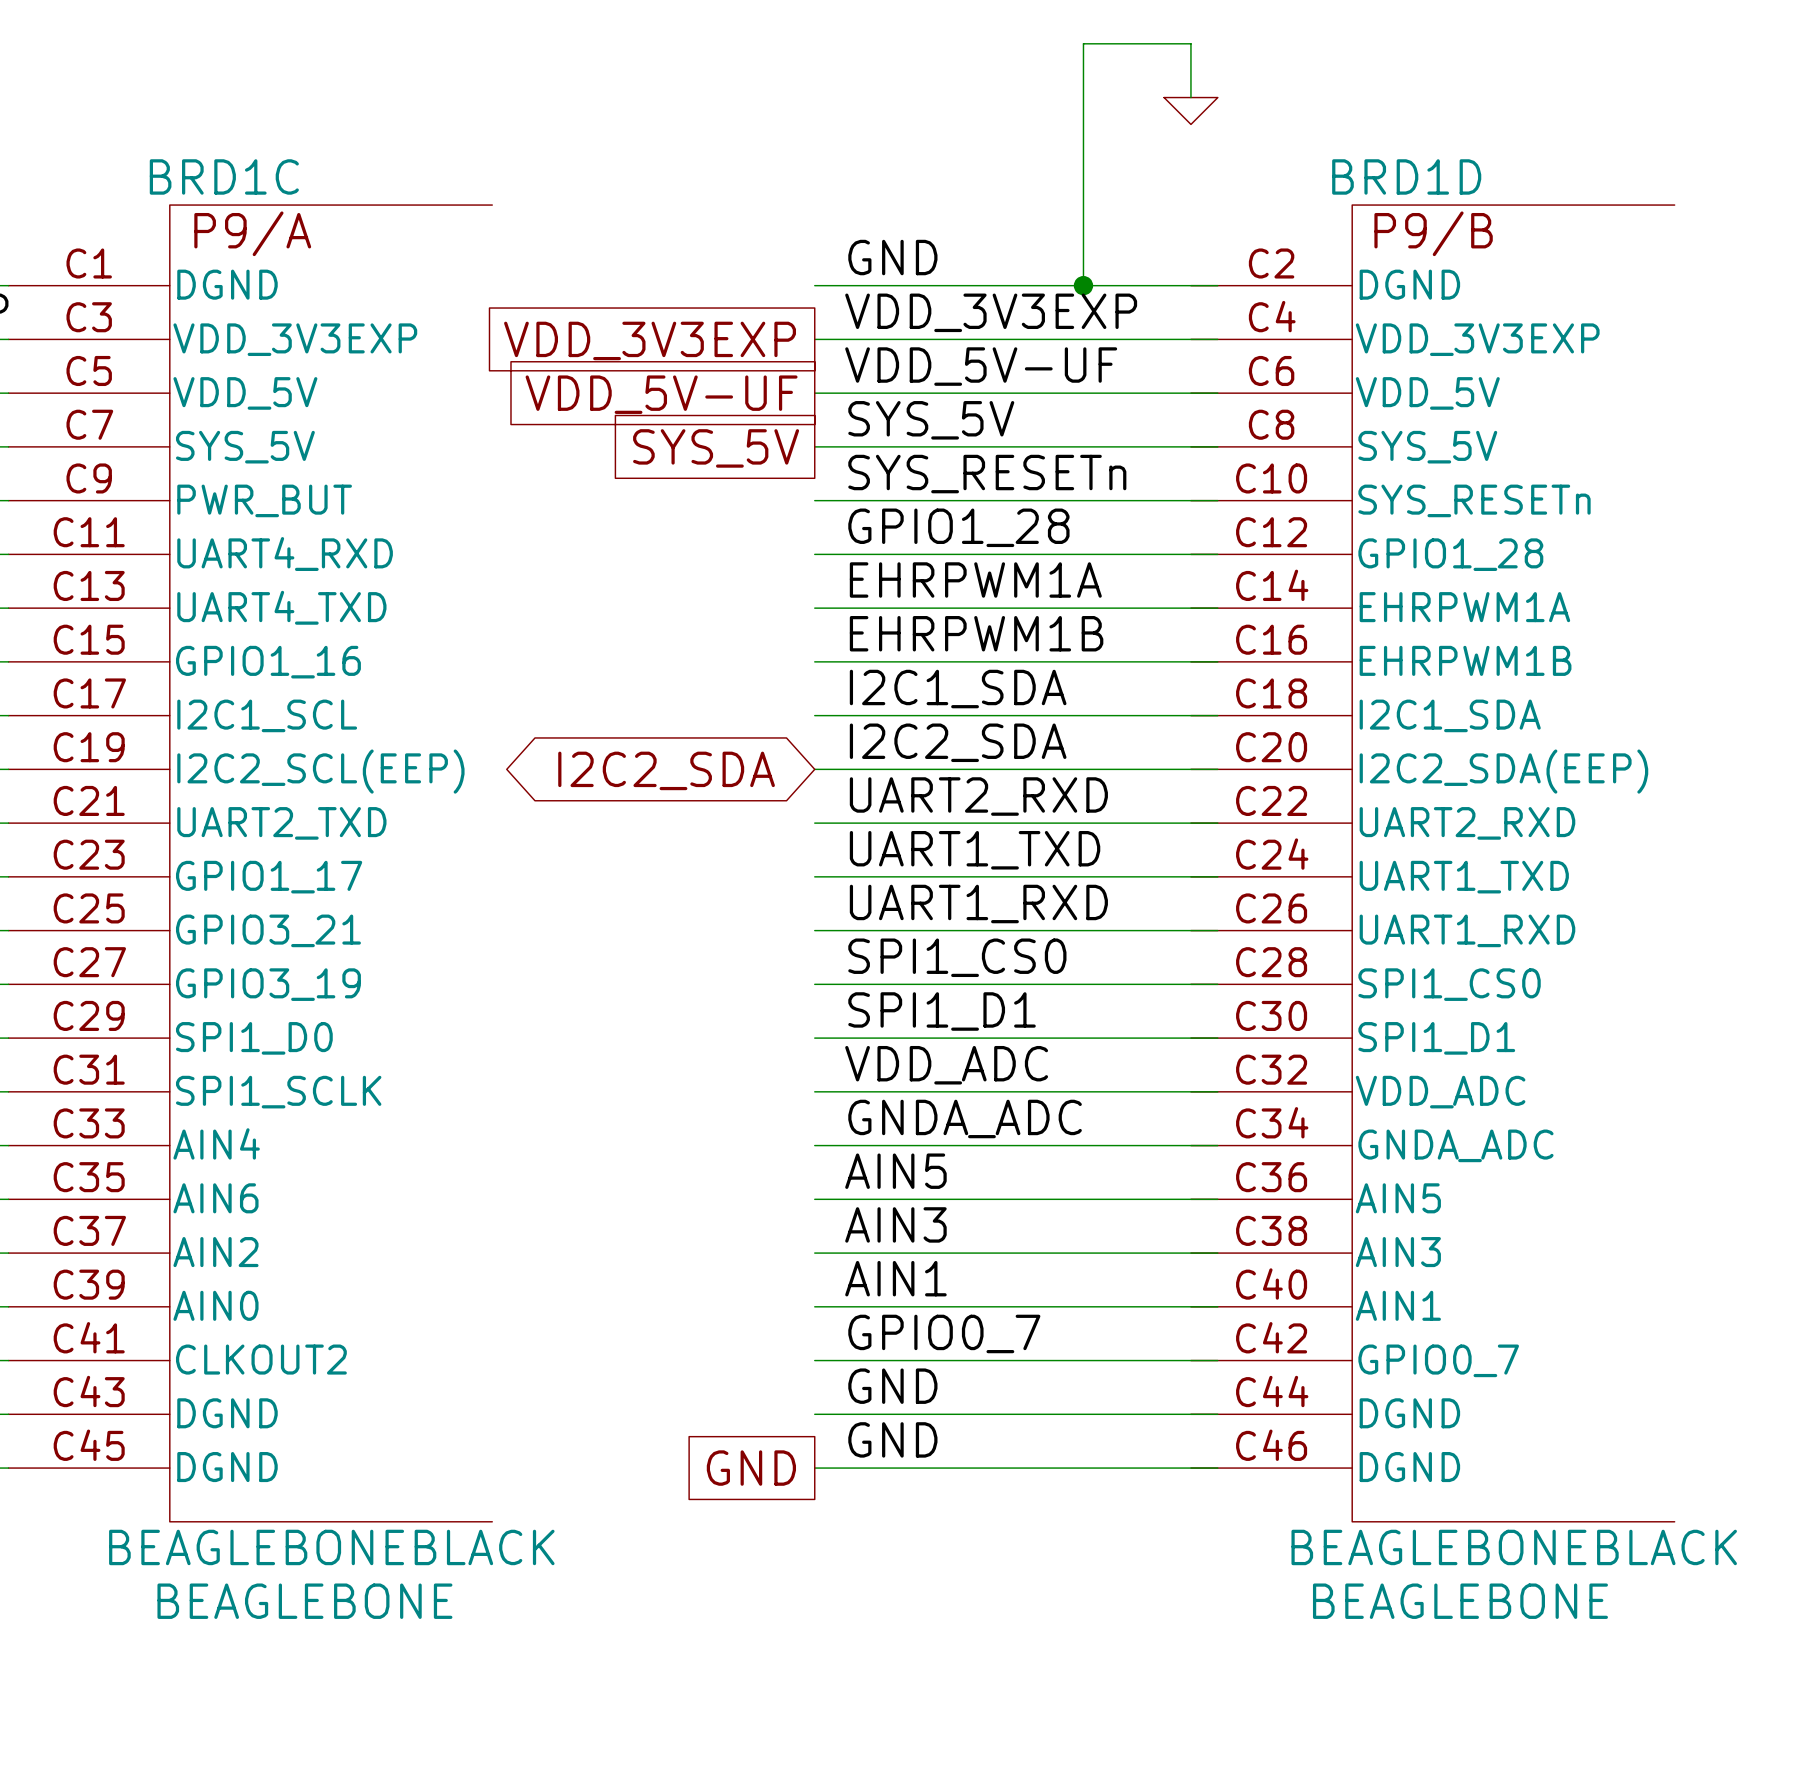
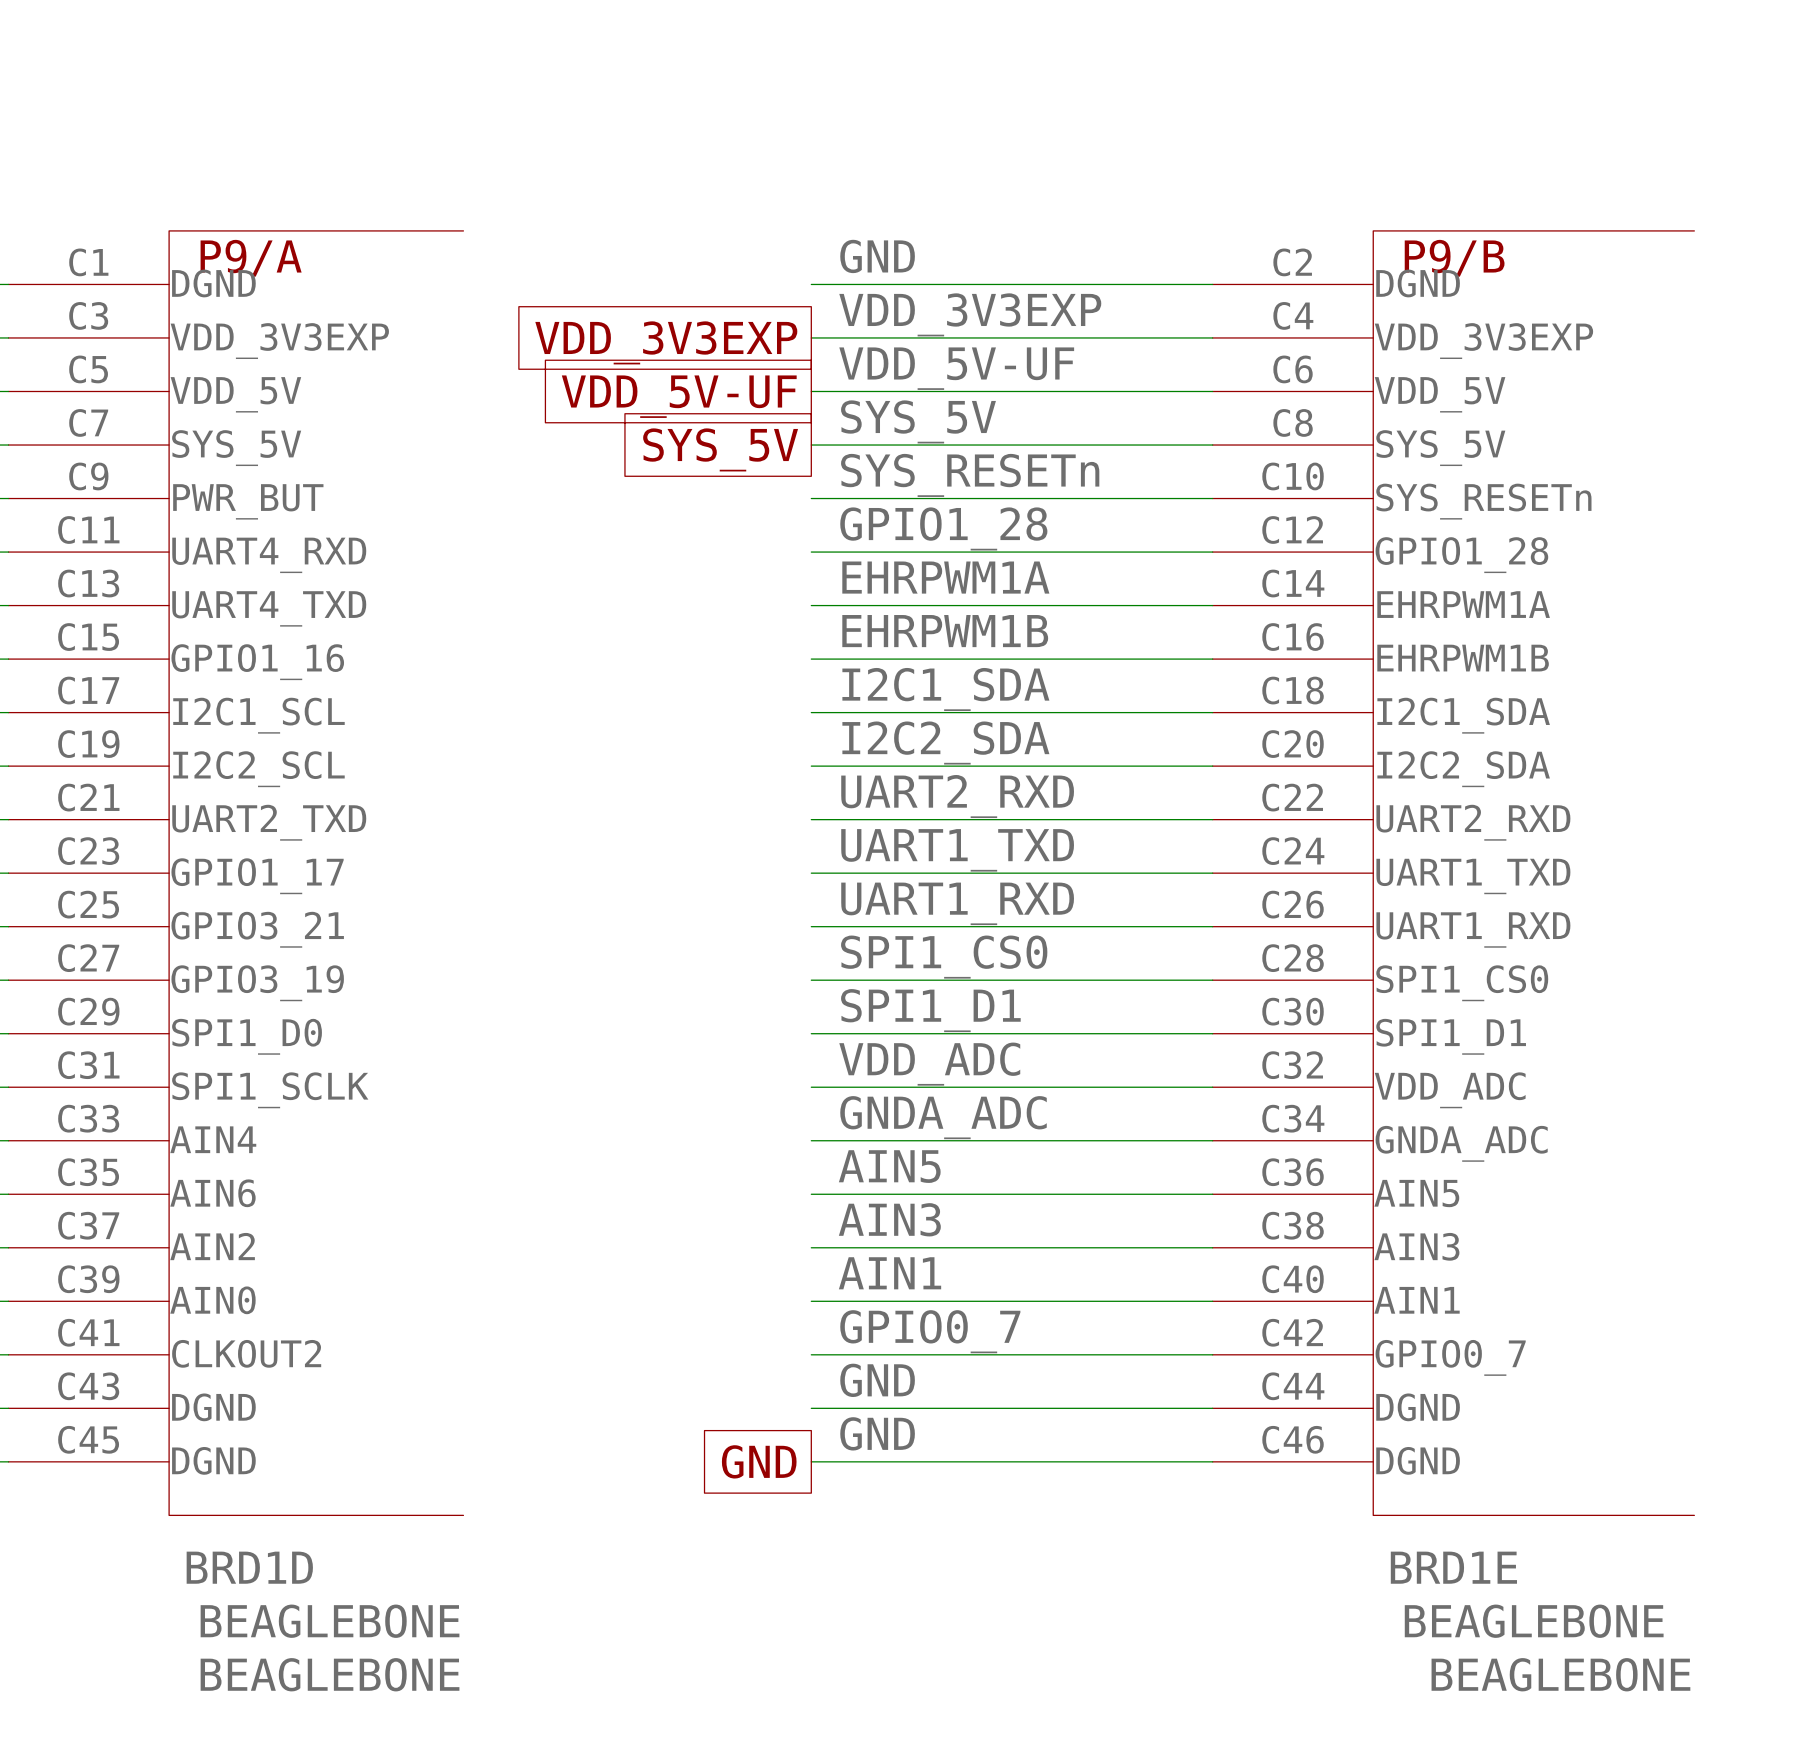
wire: (1190, 97) (1190, 43) (1083, 43) (1083, 285) -> none
power symbol: (1190, 110) -> none
BRD1D name position: BRD1D (1406, 176) -> BRD1D (249, 1567)
BRD1D symbol: [1190, 205, 1675, 1522] -> [8, 230, 464, 1516]
junction: (1083, 285) -> none
global label: I2C2_SDA (666, 770) -> none
BRD1C: BEAGLEBONEBLACK (250, 863) -> none
BRD1E: none -> BEAGLEBONE (1453, 873)
BRD1D value: BEAGLEBONEBLACK (1514, 1547) -> BEAGLEBONE (330, 1621)
BRD1D text position: BEAGLEBONE (1460, 1601) -> BEAGLEBONE (330, 1674)

